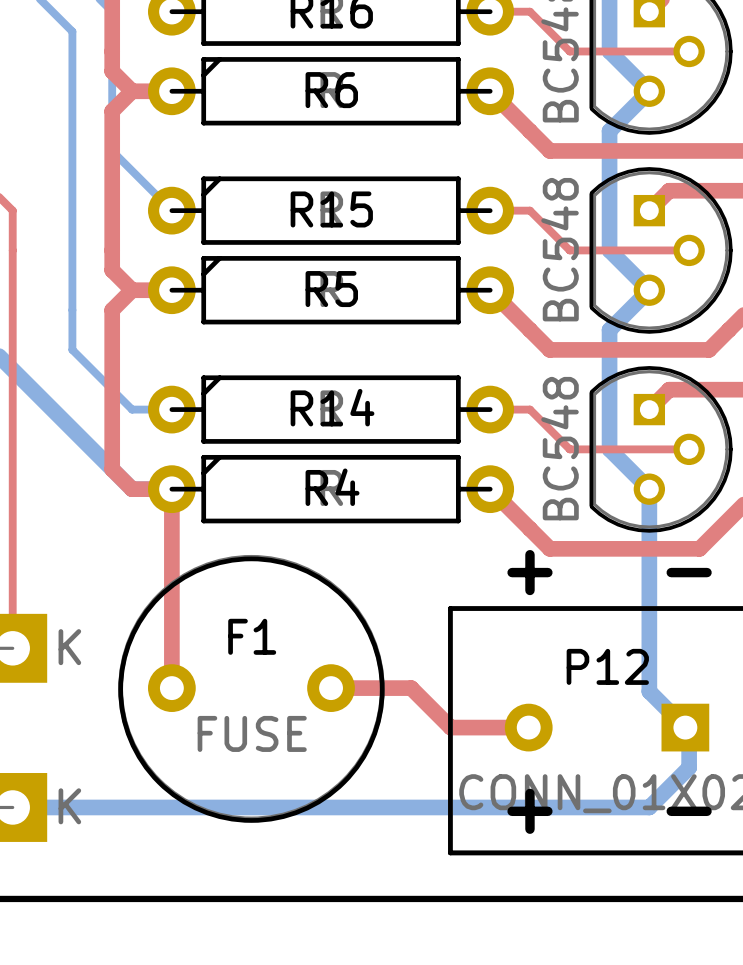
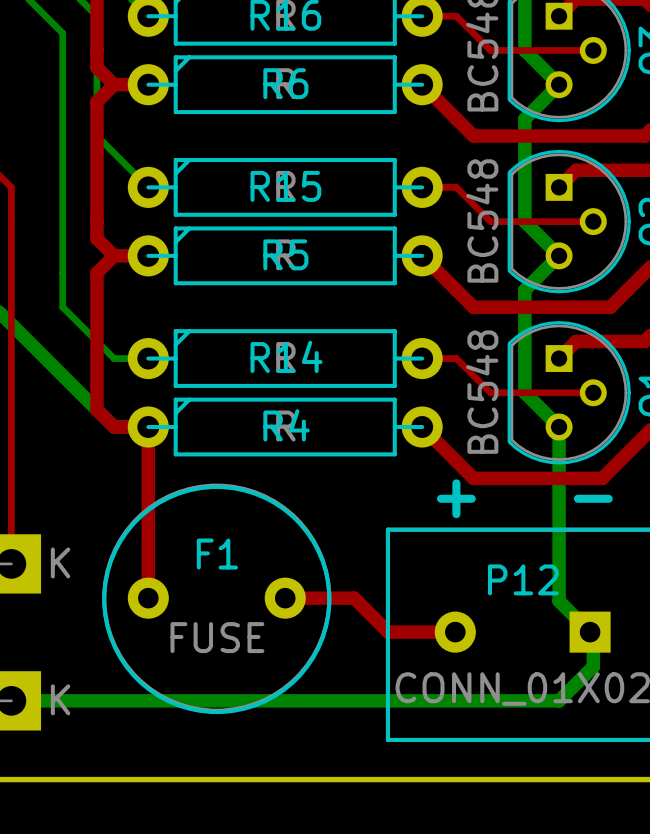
text: + (529, 811) -> none
text: - (689, 811) -> none

